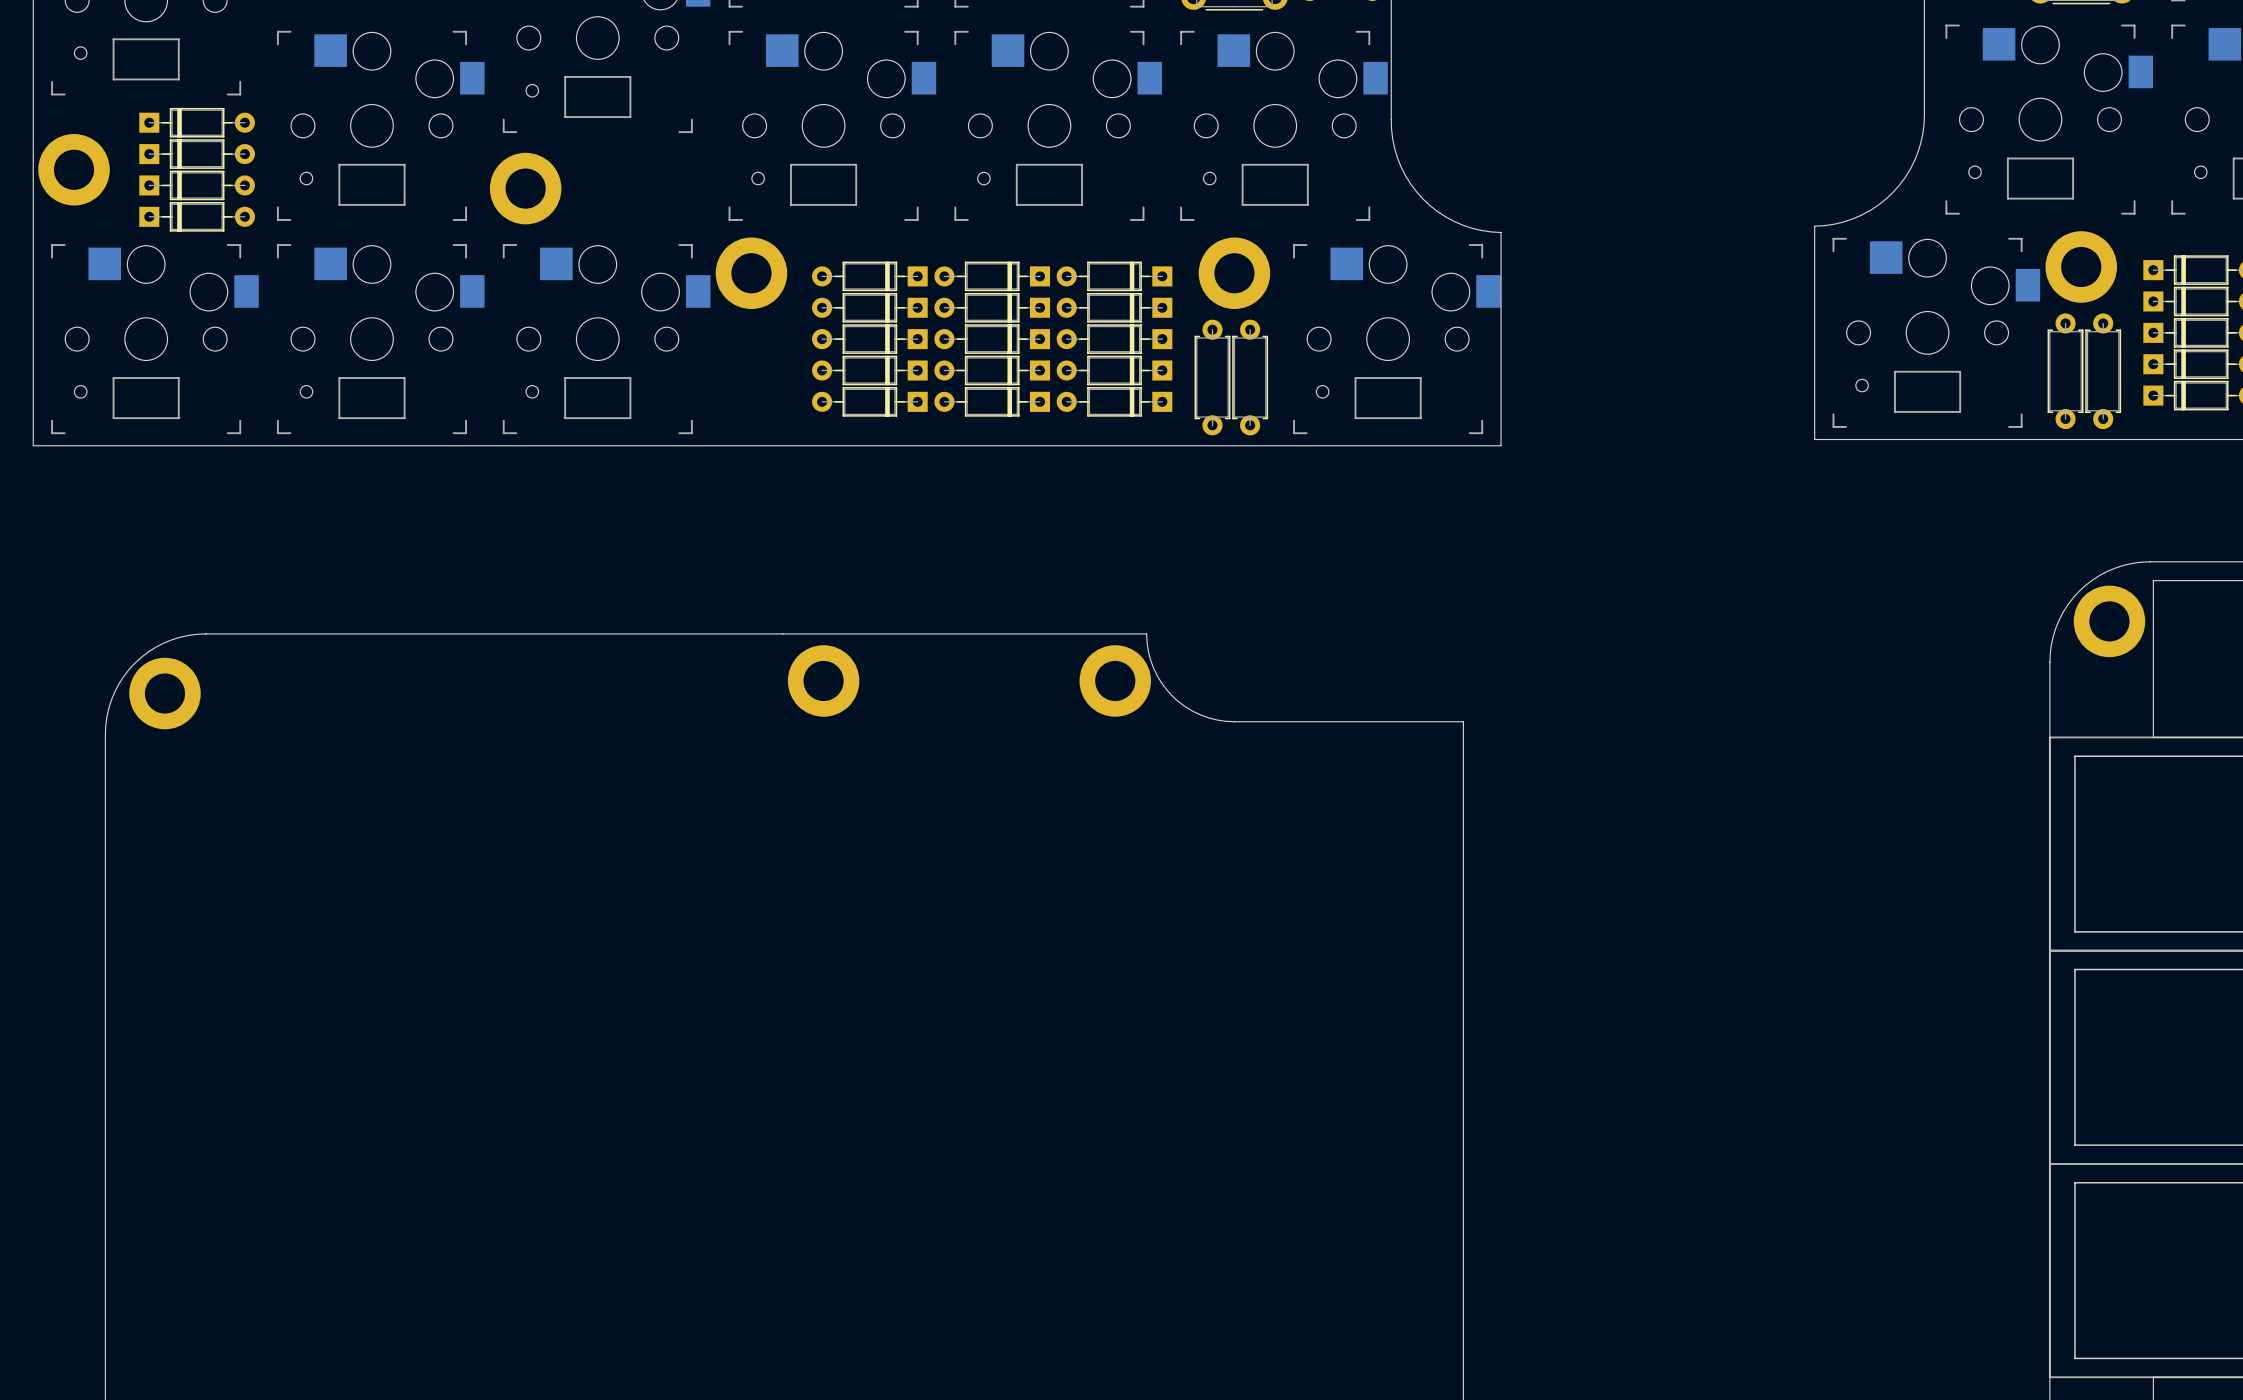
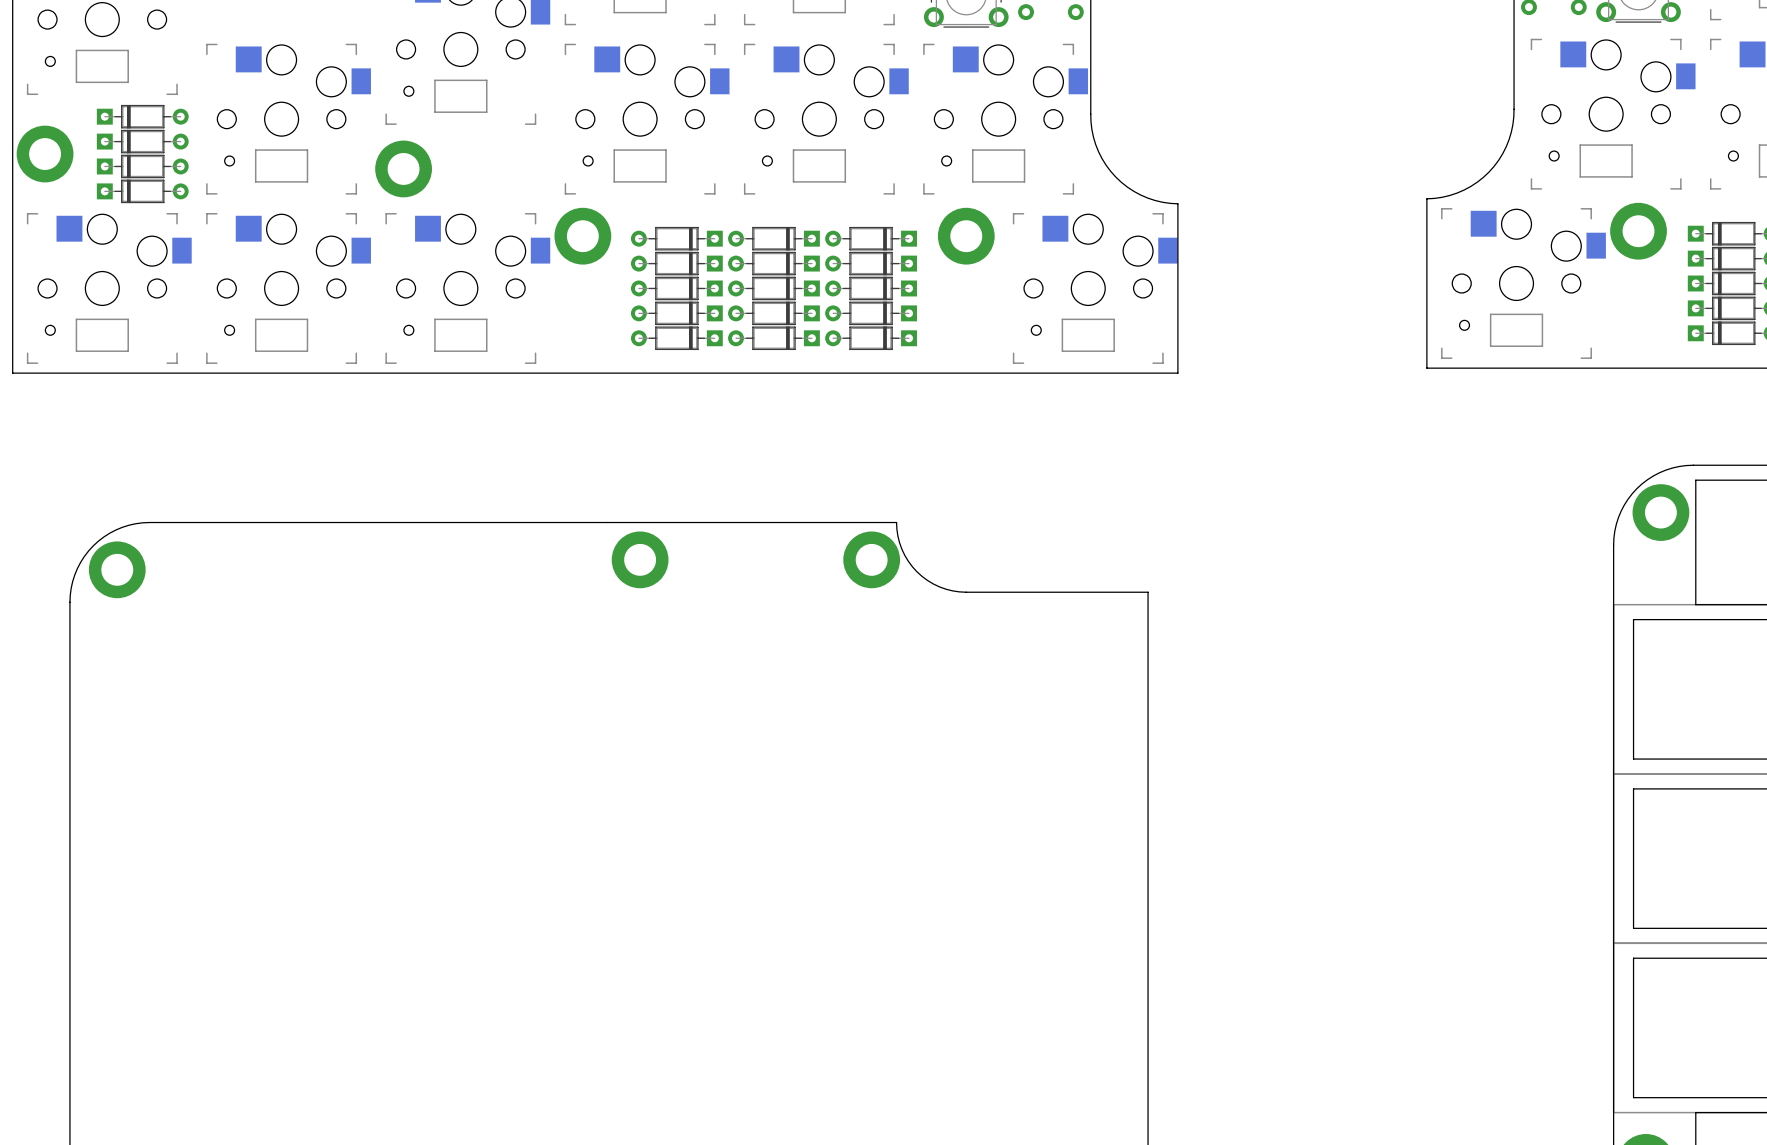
part: (2065, 371) -> none
part: (2103, 371) -> none
part: (1212, 377) -> none
part: (1250, 377) -> none

